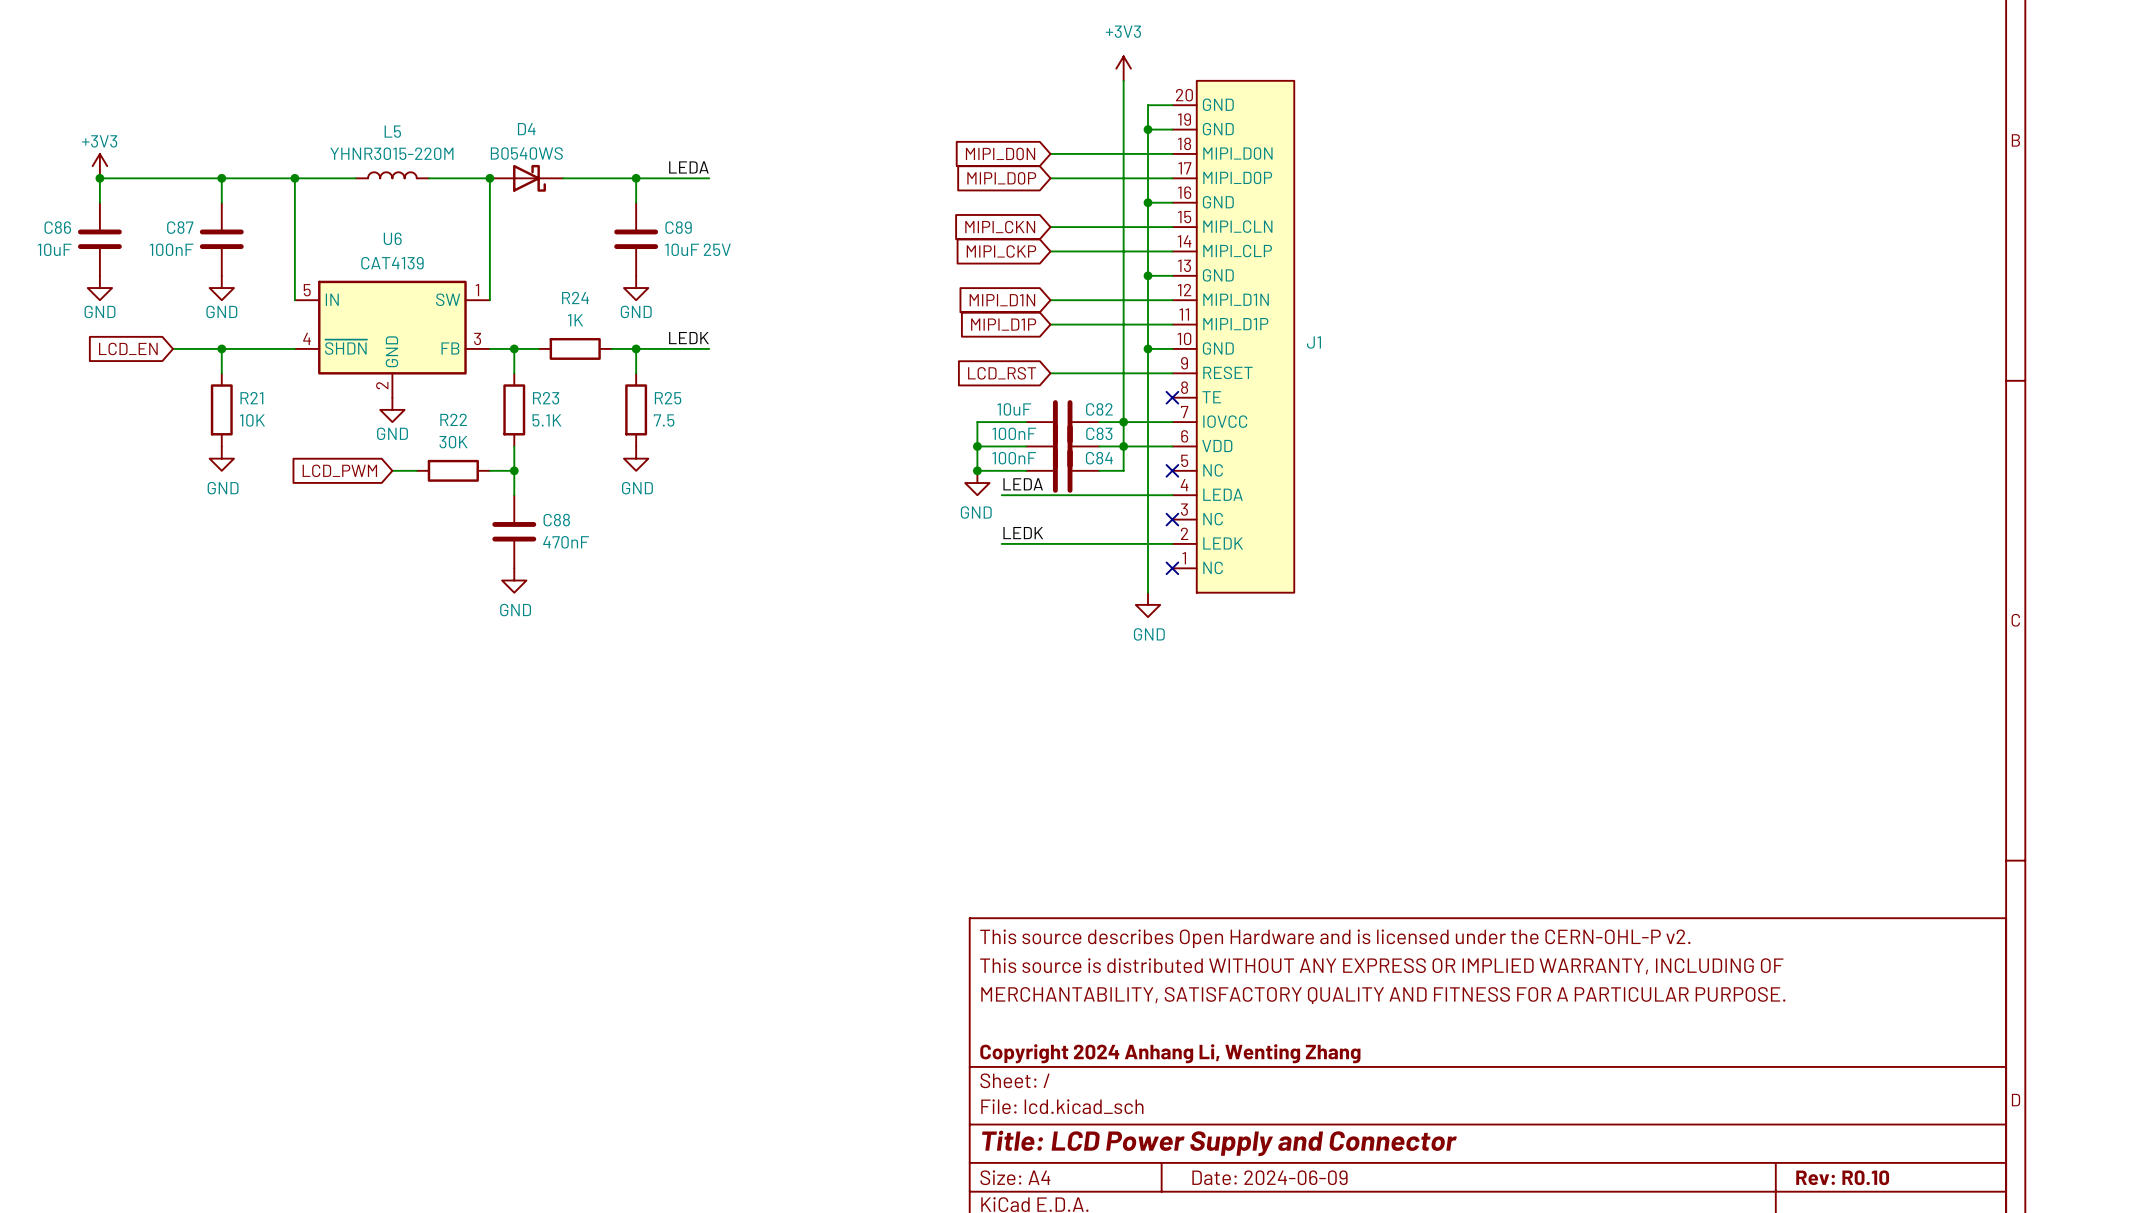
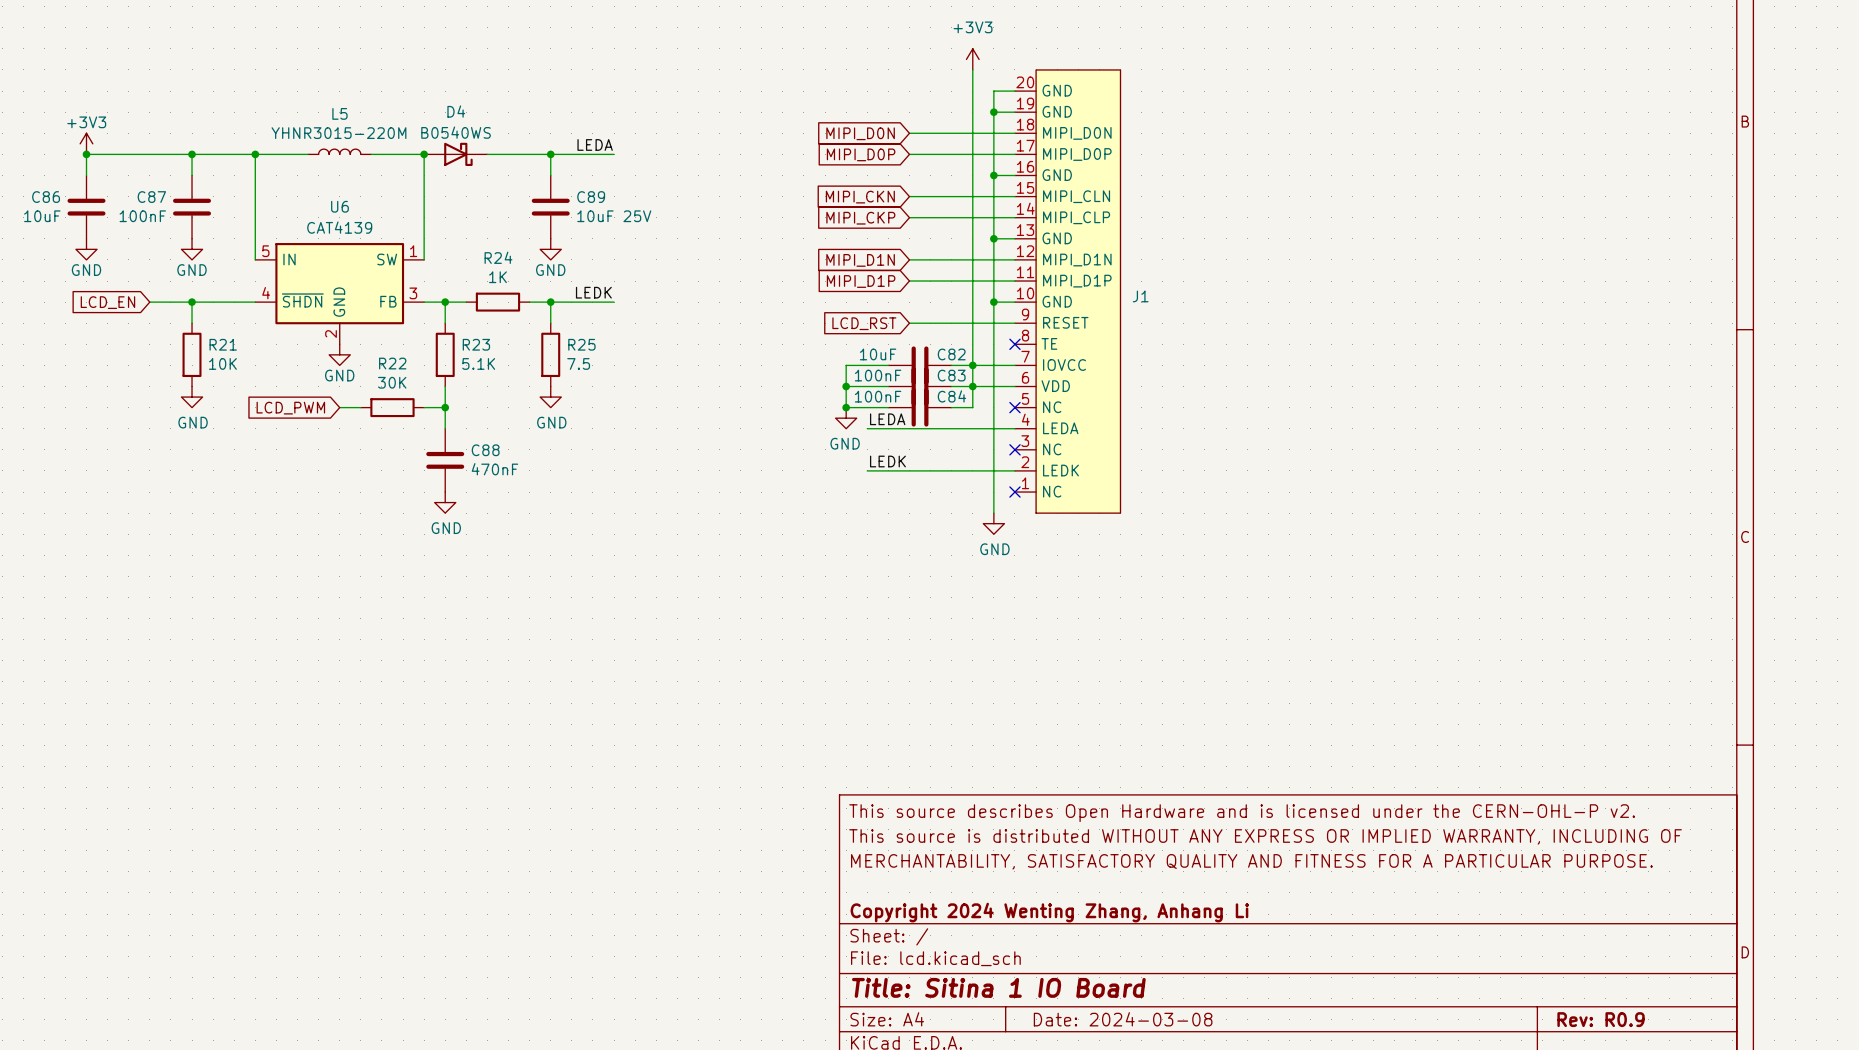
title block: Copyright 2024 Anhang Li, Wenting Zhang (1170, 1053) -> Copyright 2024 Wenting Zhang, Anhang Li (1049, 912)
title block: Title: LCD Power Supply and Connector (1219, 1143) -> Title: Sitina 1 IO Board (998, 987)
title block: Date: 2024-06-09 (1269, 1177) -> Date: 2024-03-08 (1123, 1019)
title block: Rev: R0.10 (1842, 1177) -> Rev: R0.9 (1601, 1019)

